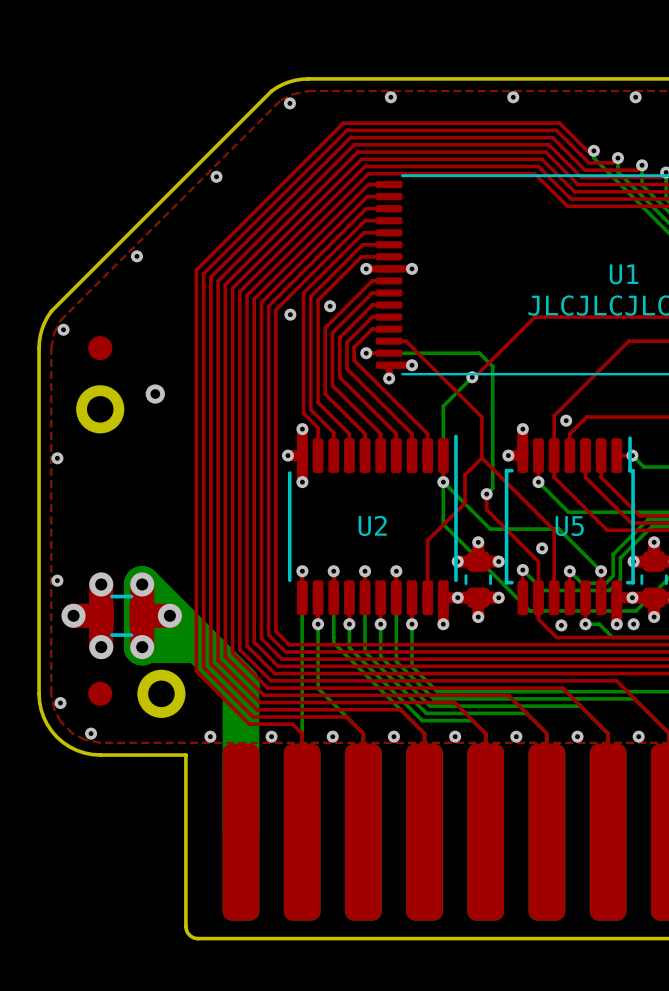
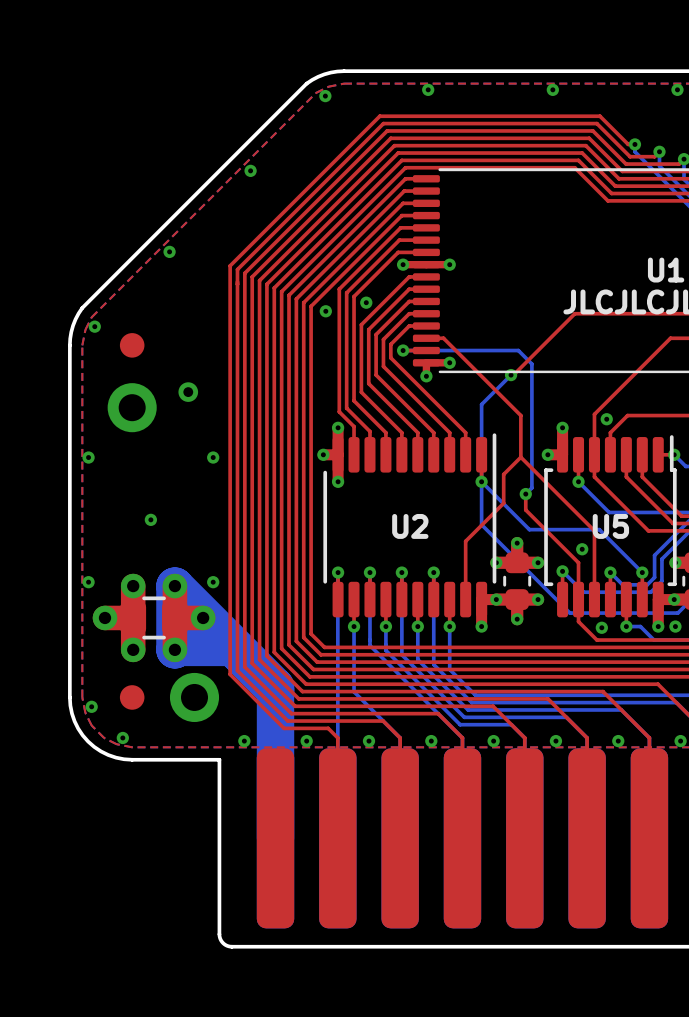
via: none -> (213, 457)
via: none -> (150, 519)
via: none -> (213, 582)

